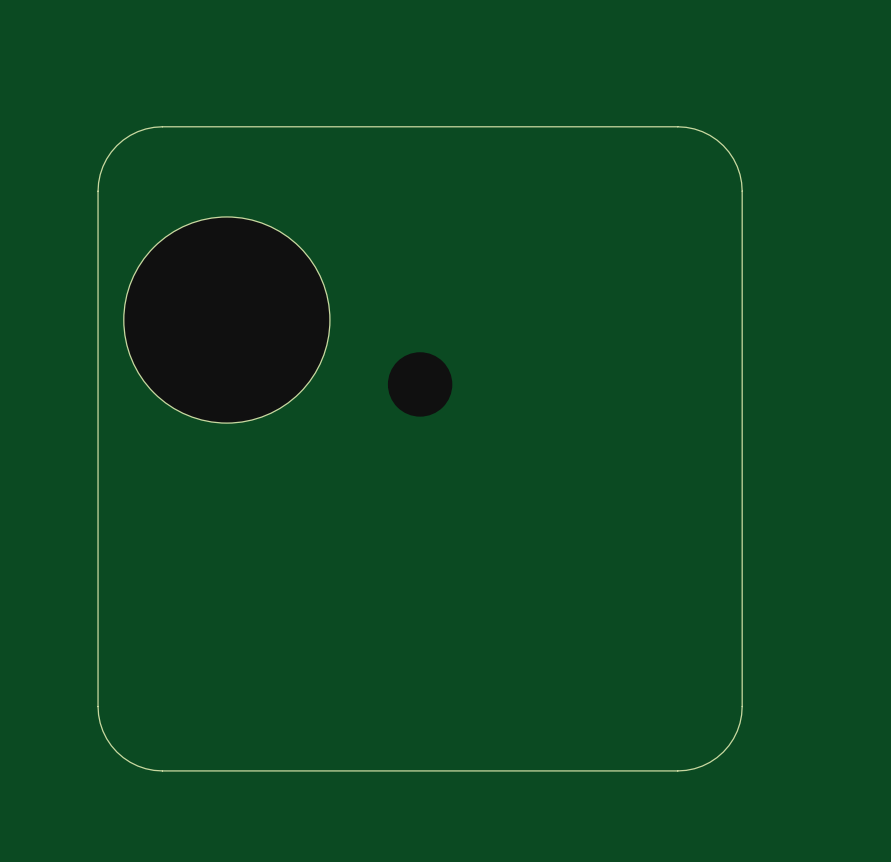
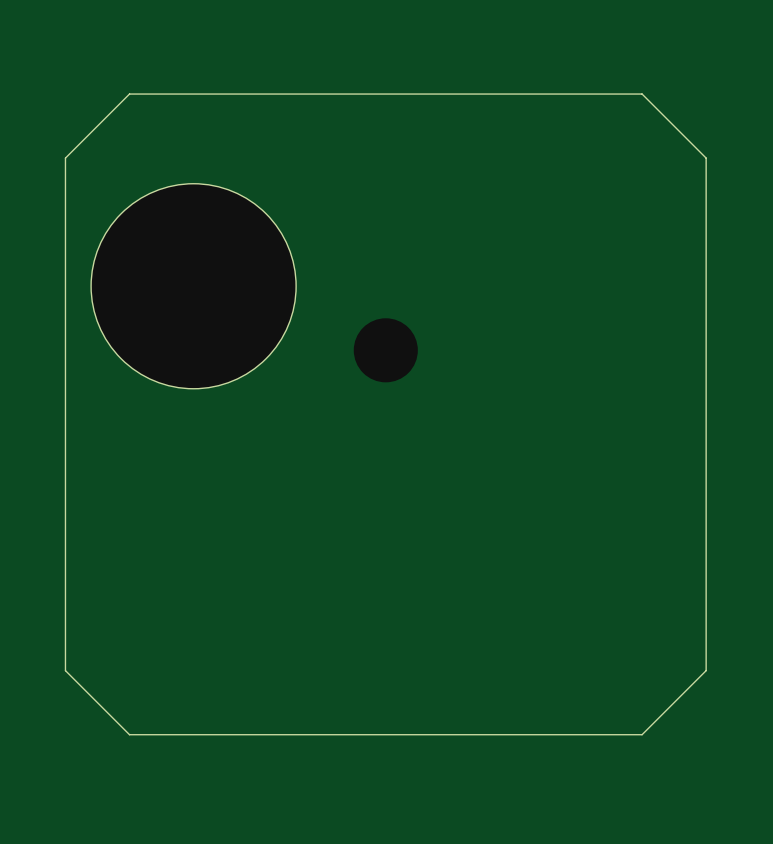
board edge: (162, 126) (137, 131) (116, 145) (102, 166) (98, 191) -> (129, 94) (65, 158)
board edge: (677, 126) (702, 131) (723, 145) (737, 166) (742, 191) -> (642, 94) (706, 158)
board edge: (98, 706) (102, 731) (116, 752) (137, 766) (162, 770) -> (65, 670) (129, 734)
board edge: (742, 706) (737, 731) (723, 752) (702, 766) (677, 770) -> (706, 670) (642, 734)

